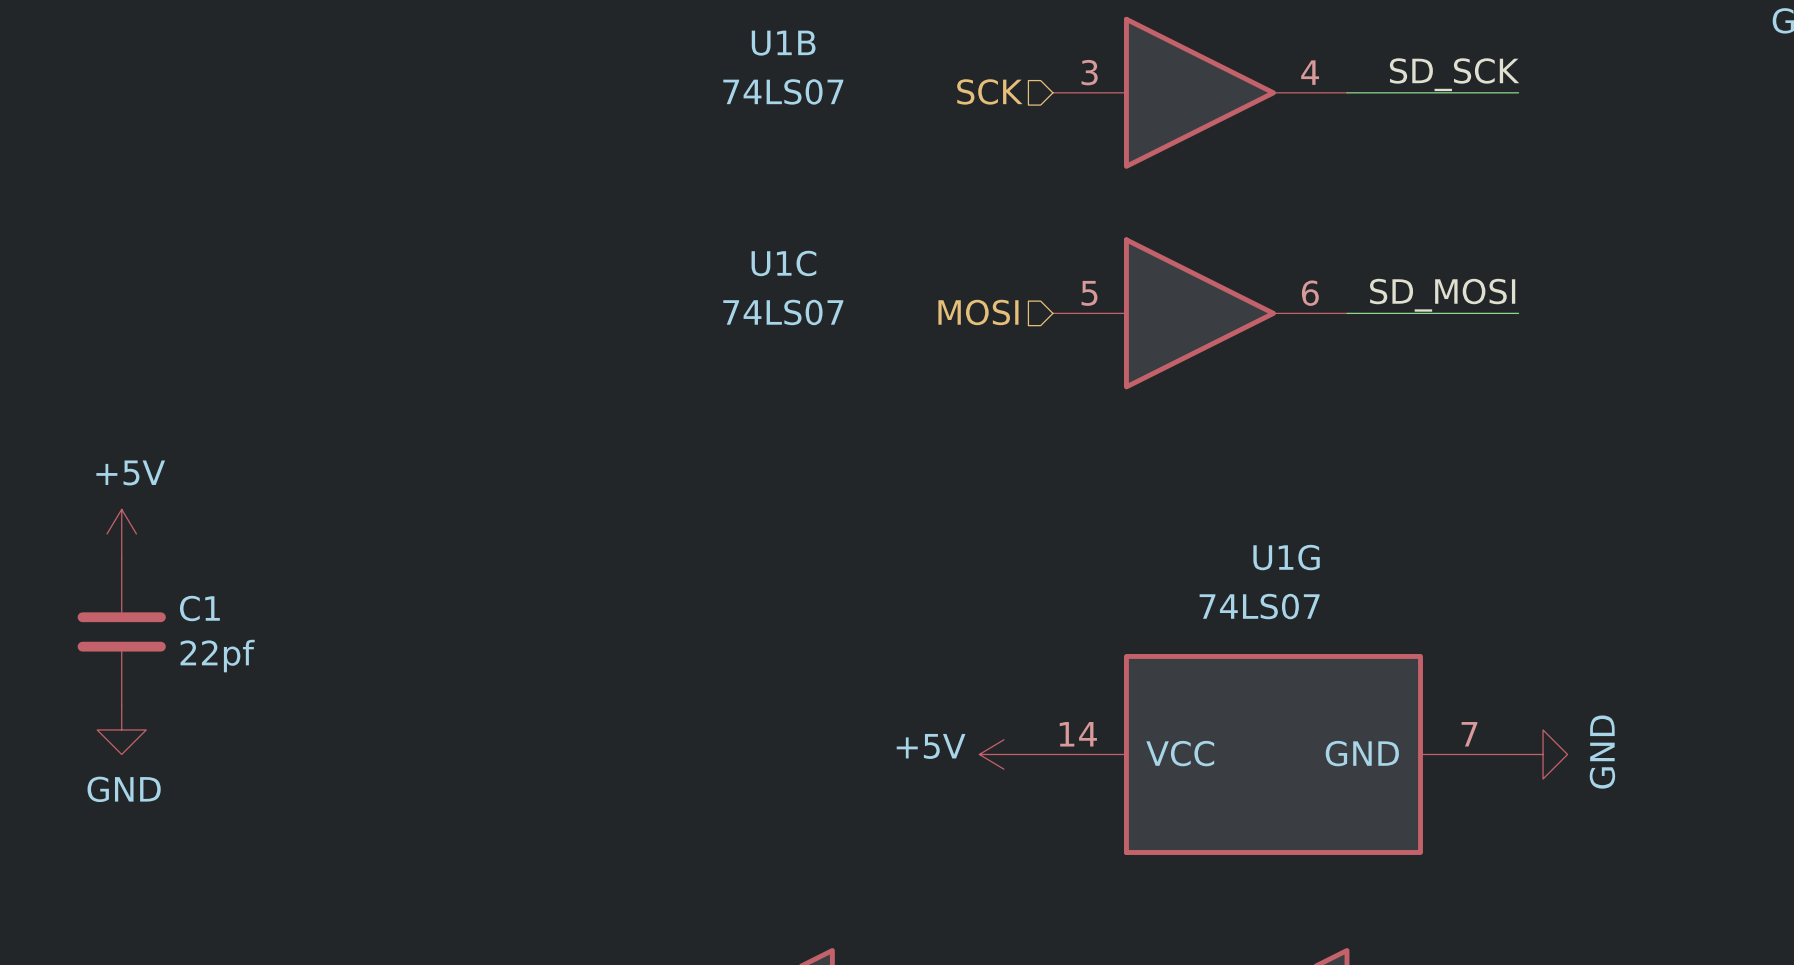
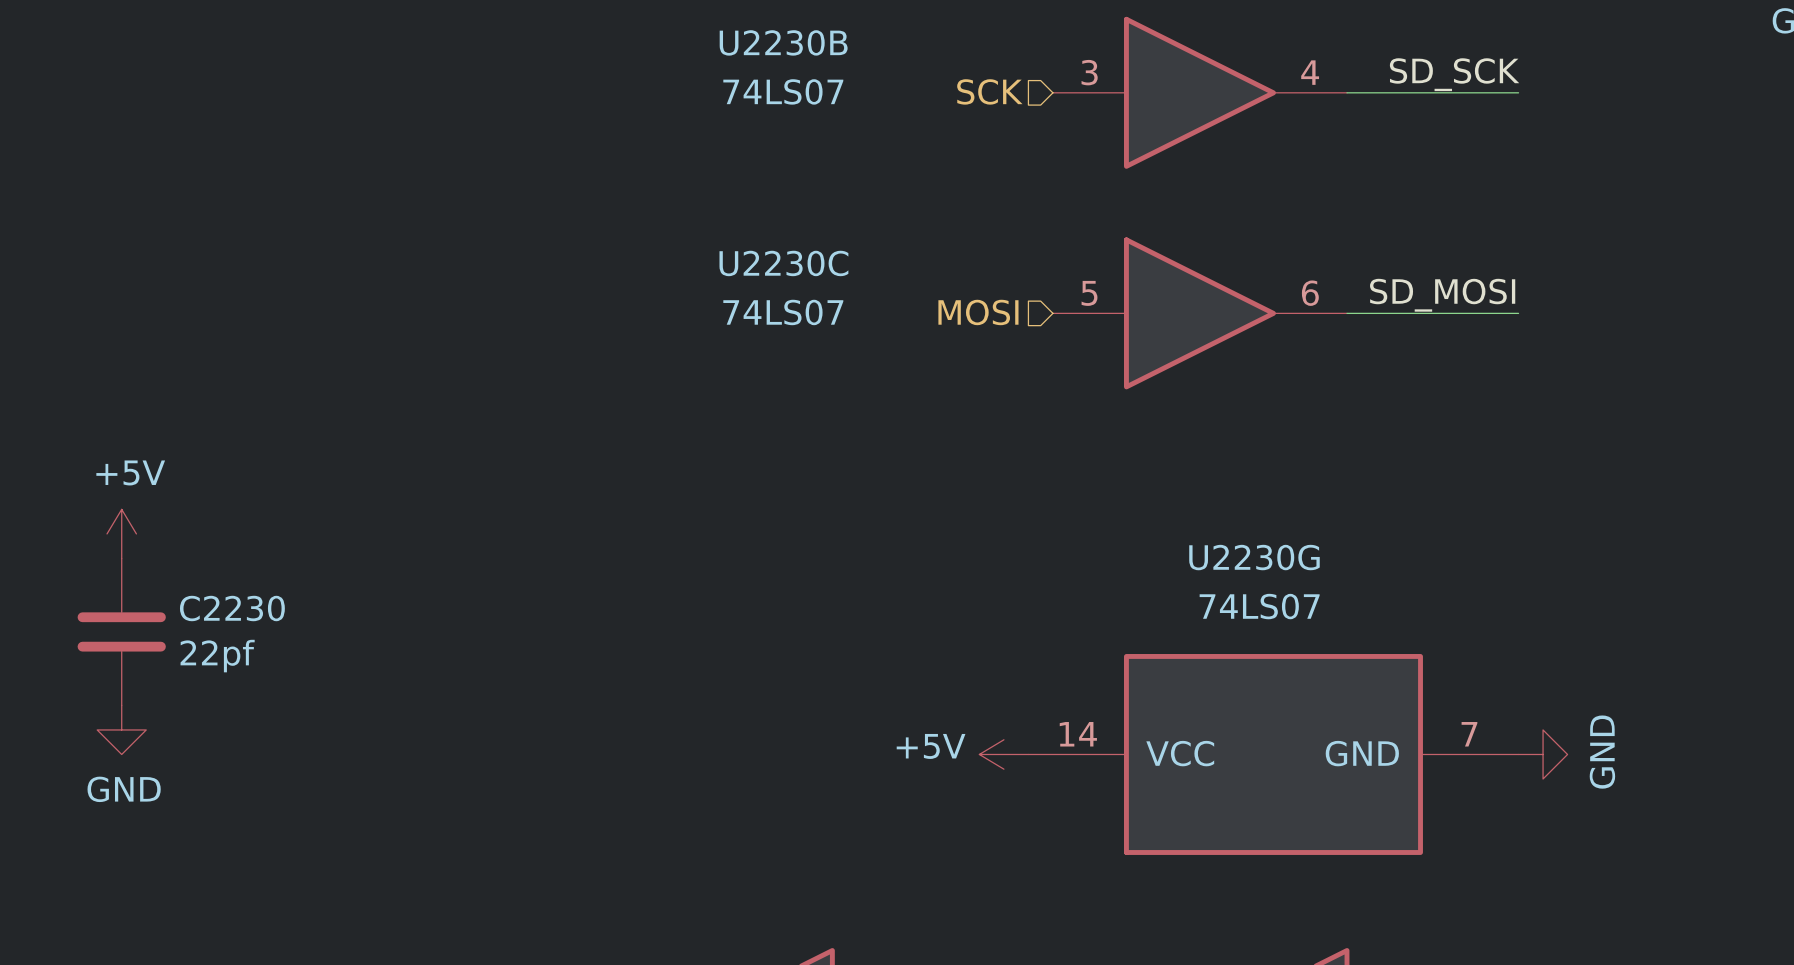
U1B name: U1B (783, 43) -> U2230B (783, 42)
U1C name: U1C (783, 263) -> U2230C (783, 263)
U1G name: U1G (1286, 557) -> U2230G (1254, 557)
C1 name: C1 (199, 608) -> C2230 (232, 608)

